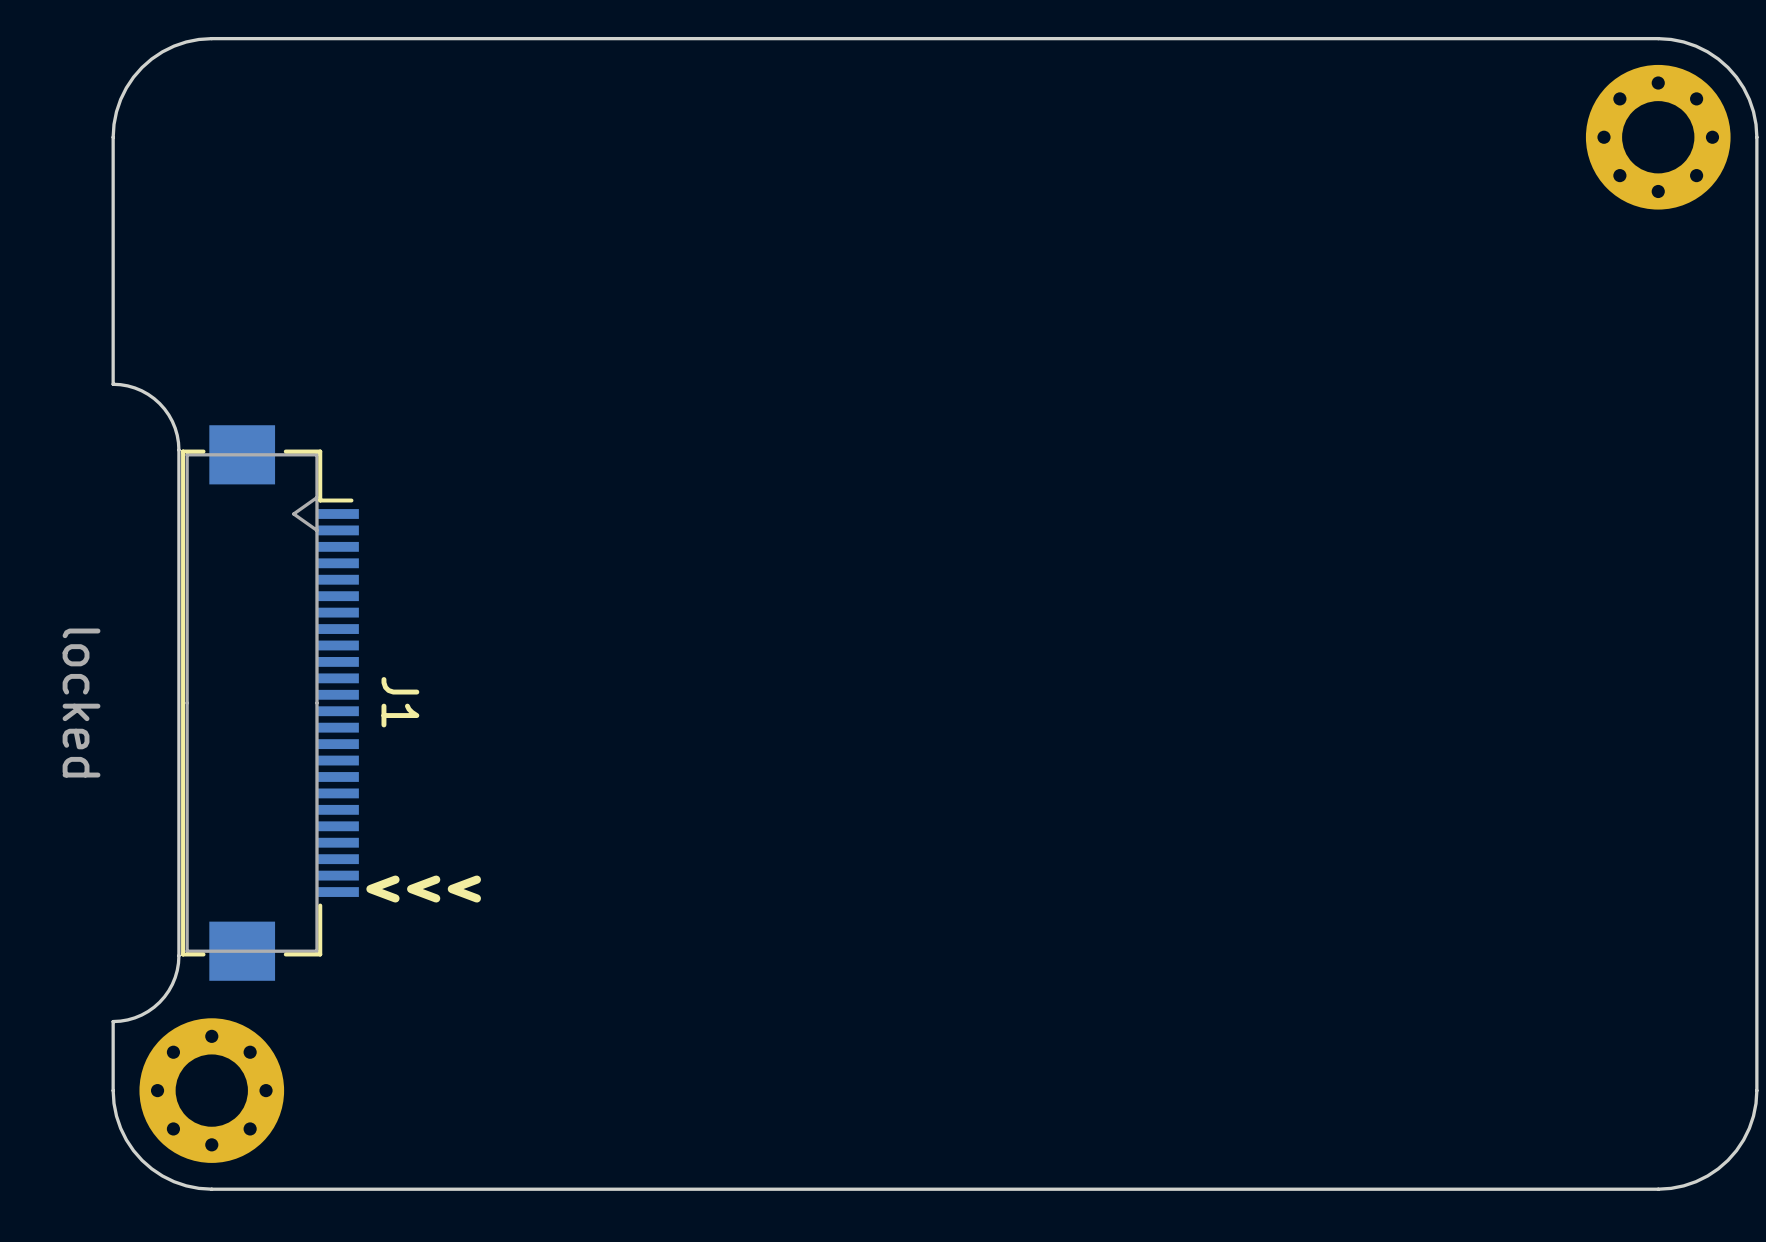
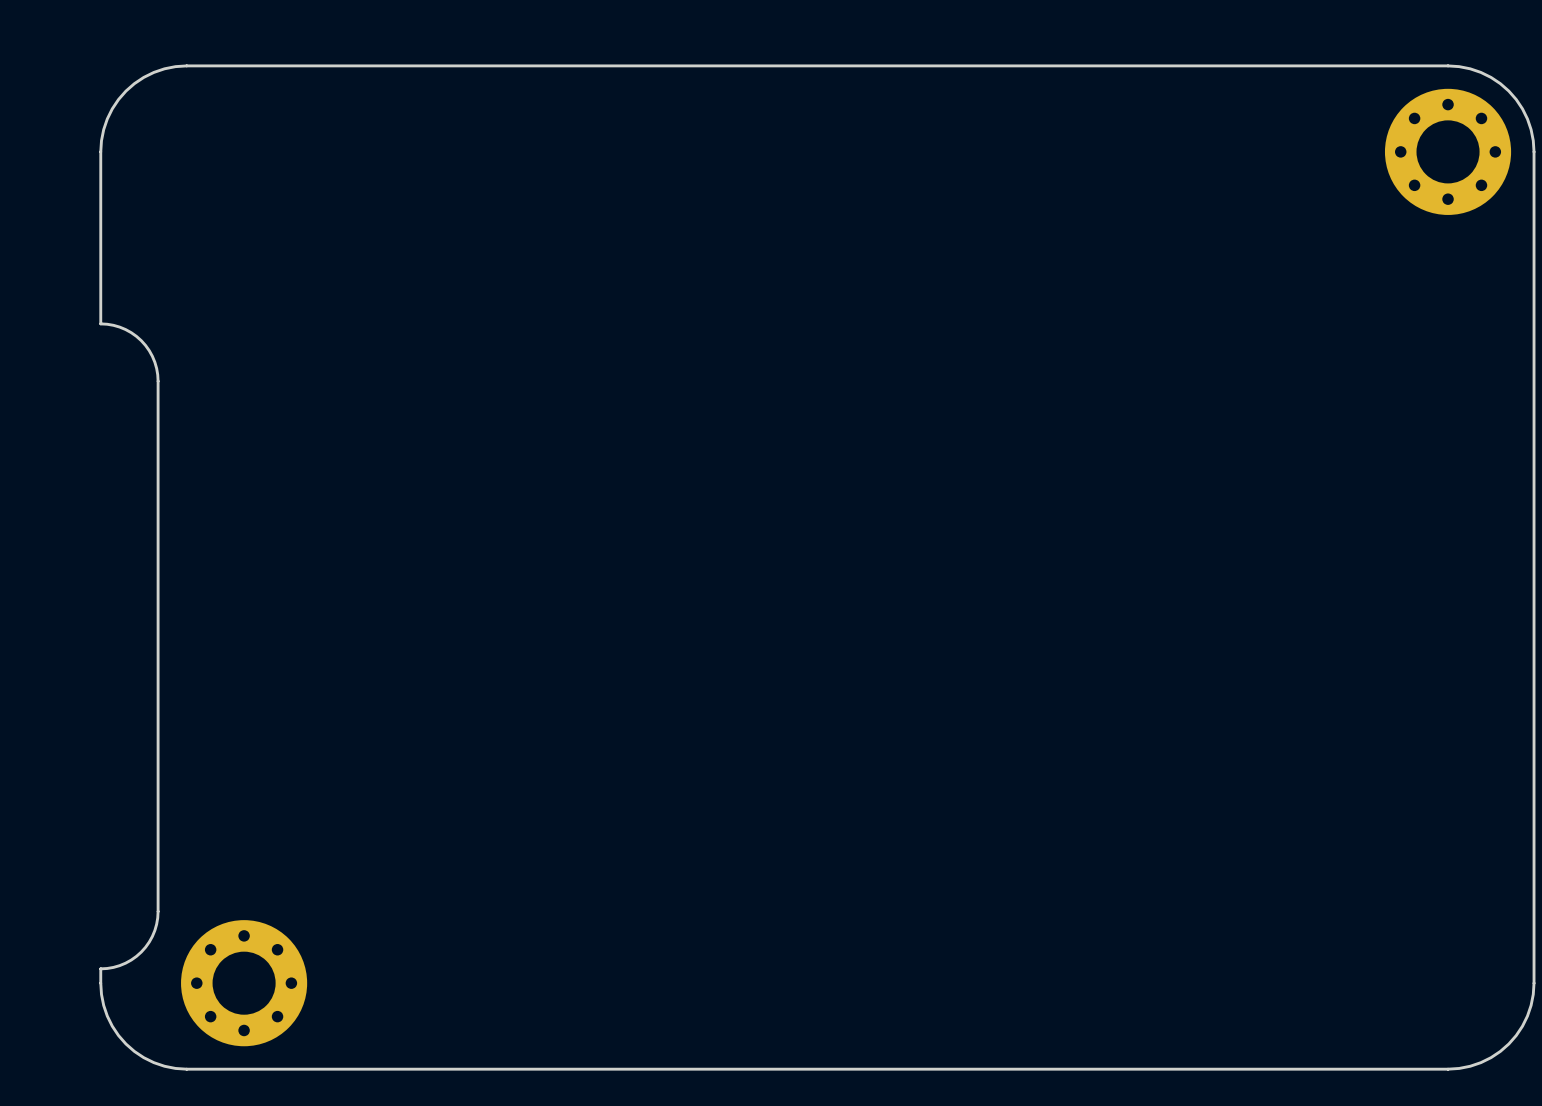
board edge: (113, 334) (113, 384) (134, 387) (148, 394) (159, 403) (168, 415) (175, 428) (178, 450) -> (100, 323) (119, 327) (131, 332) (149, 350) (157, 374) (158, 424)
J1: locked (269, 703) -> none
board edge: (178, 955) (177, 970) (172, 984) (159, 1002) (141, 1015) (127, 1019) (113, 1021) (113, 1074) -> (158, 865) (157, 917) (149, 942) (136, 956) (125, 963) (100, 968)
part position: (211, 1090) -> (244, 983)

